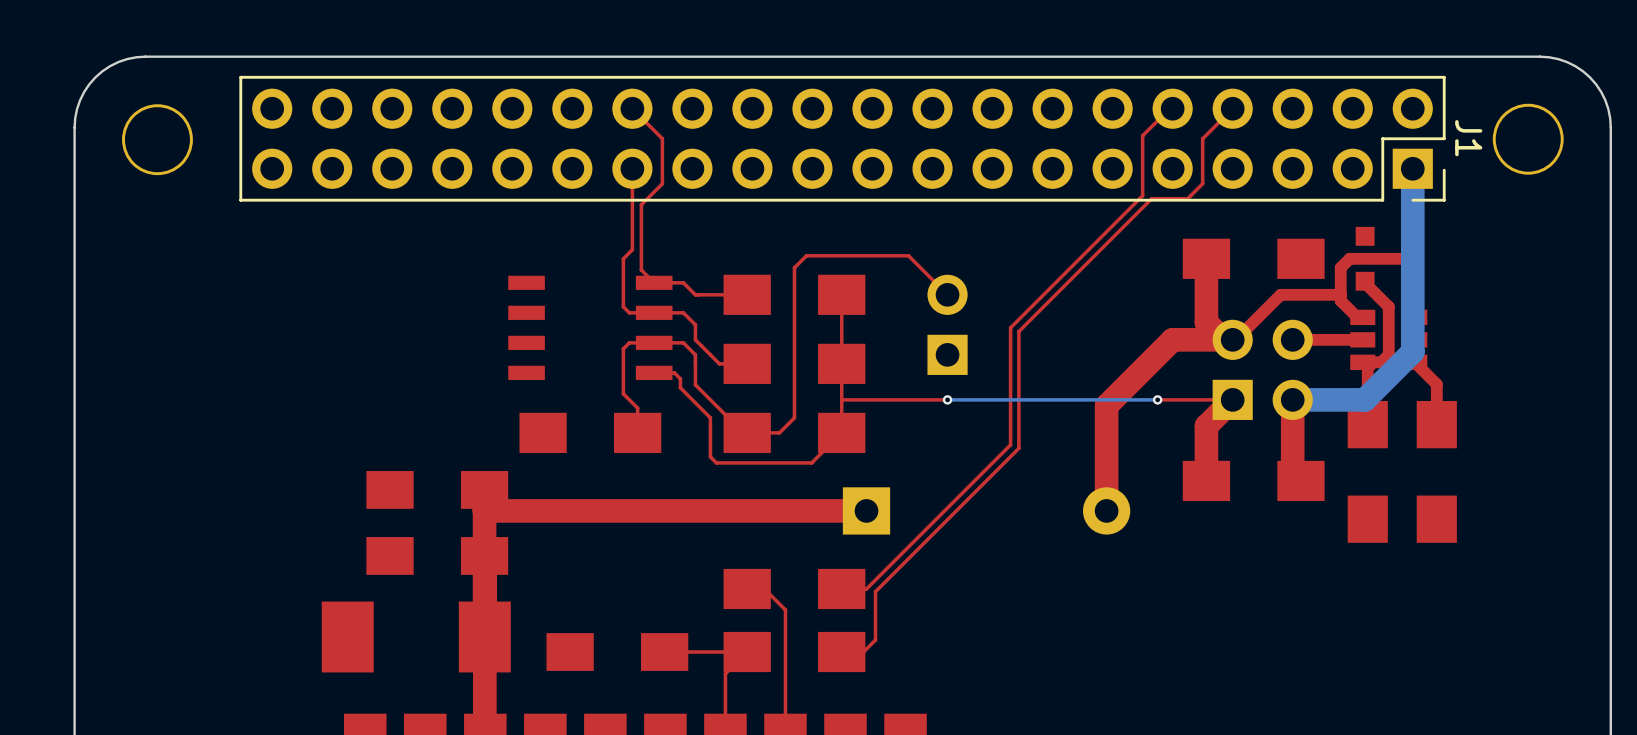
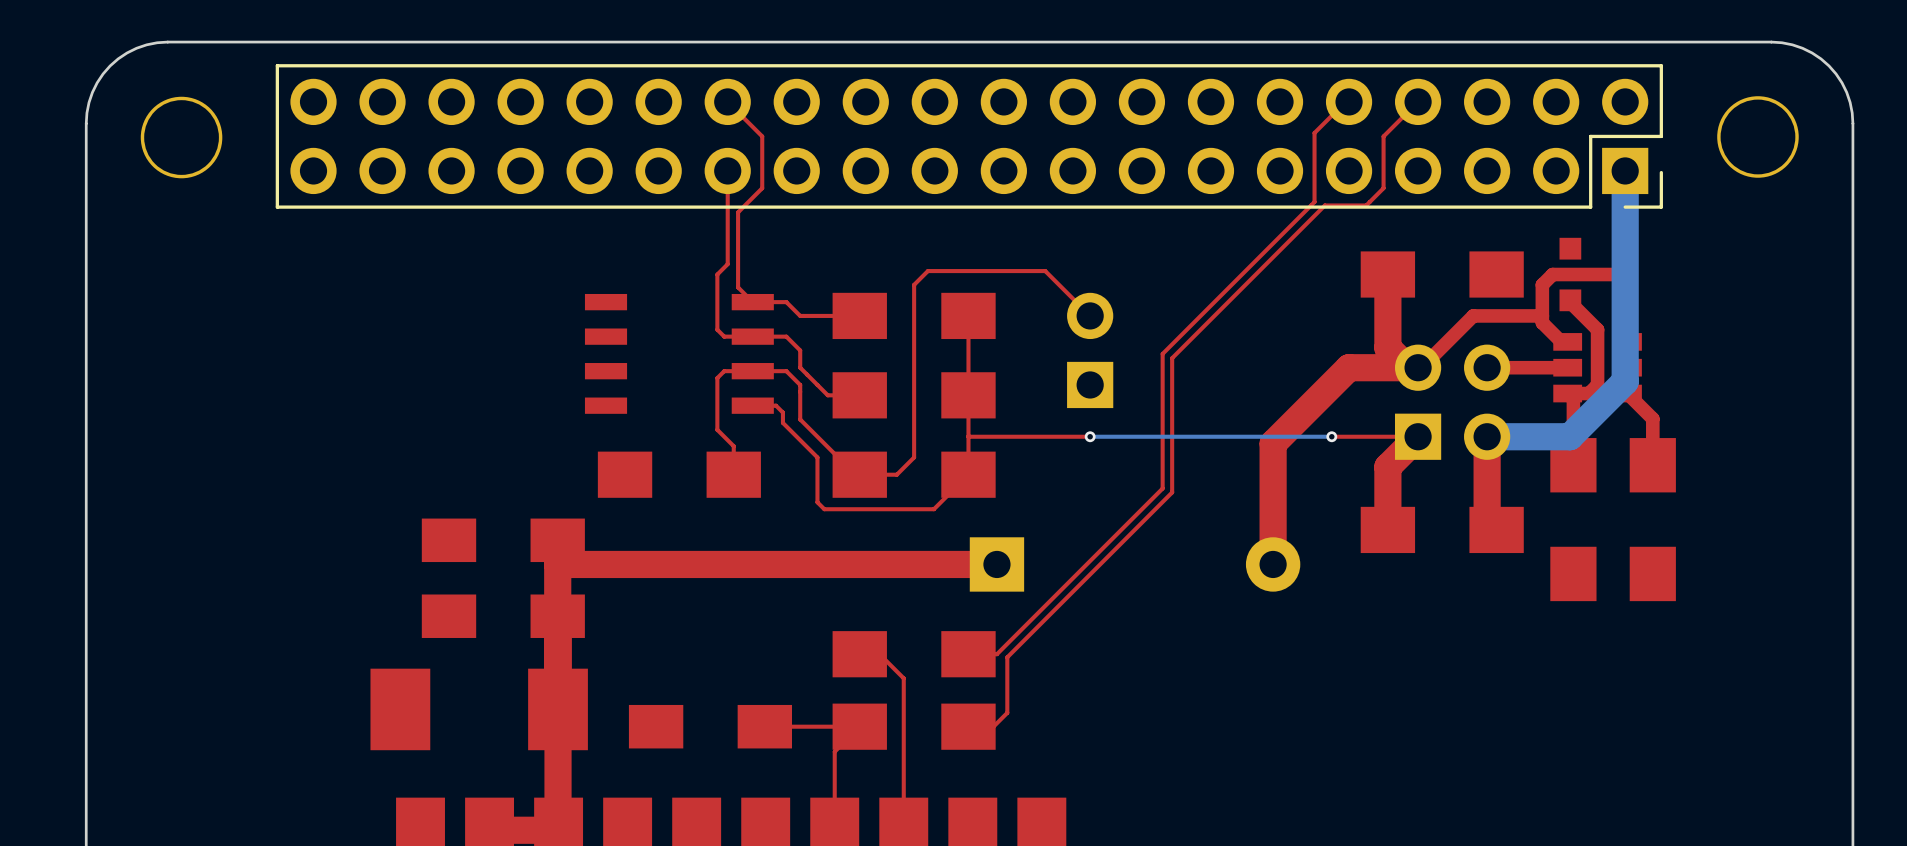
J1 name: J1 (1468, 138) -> none

